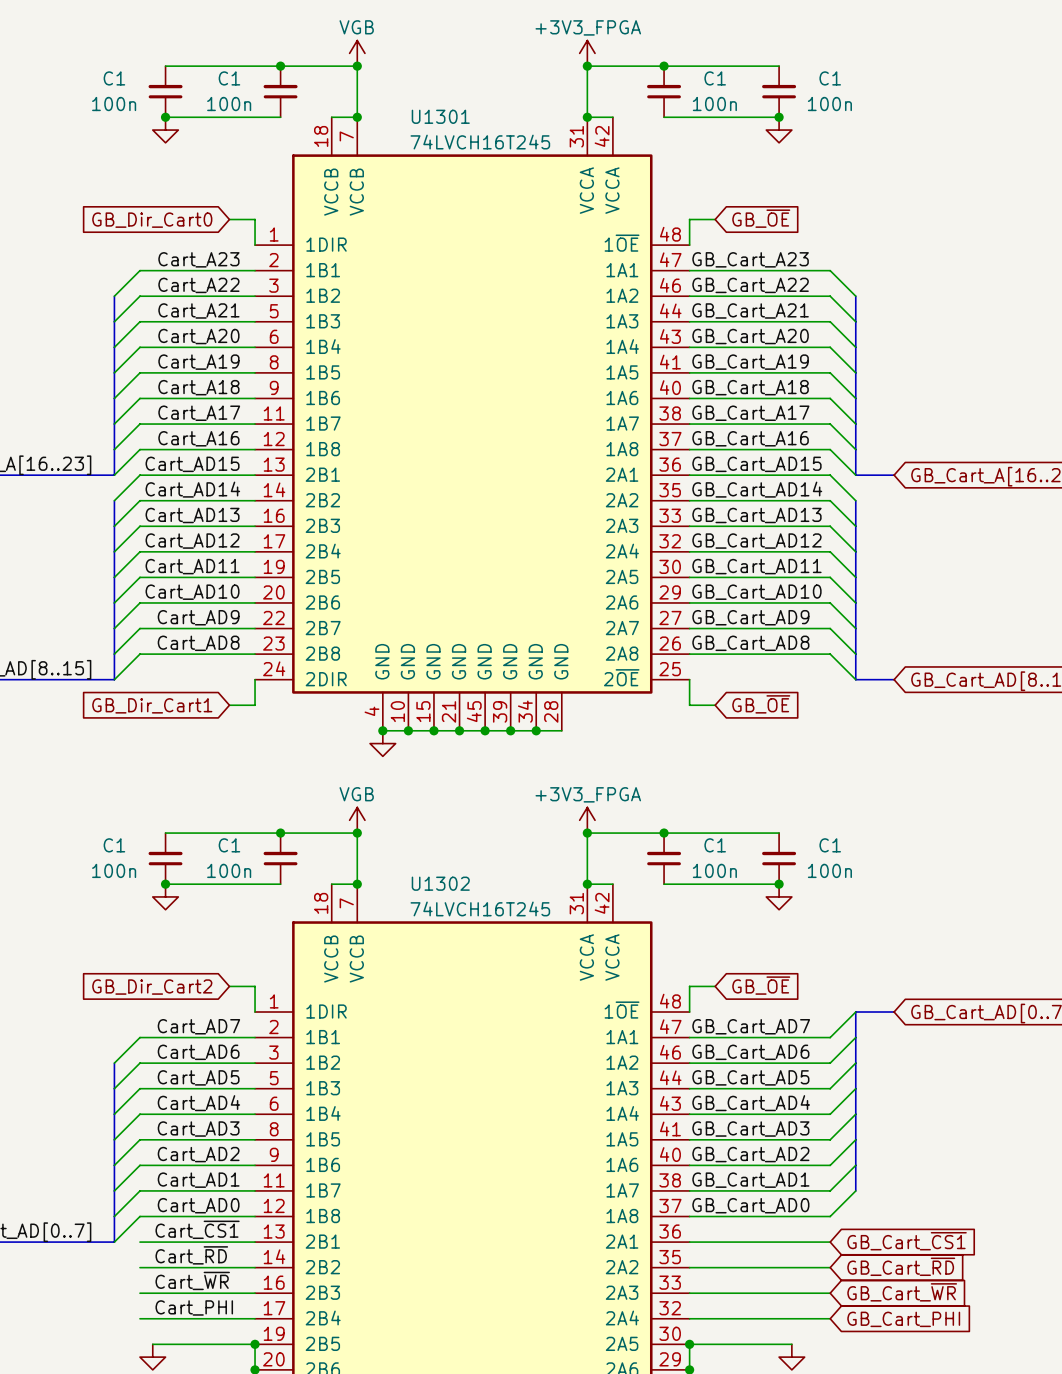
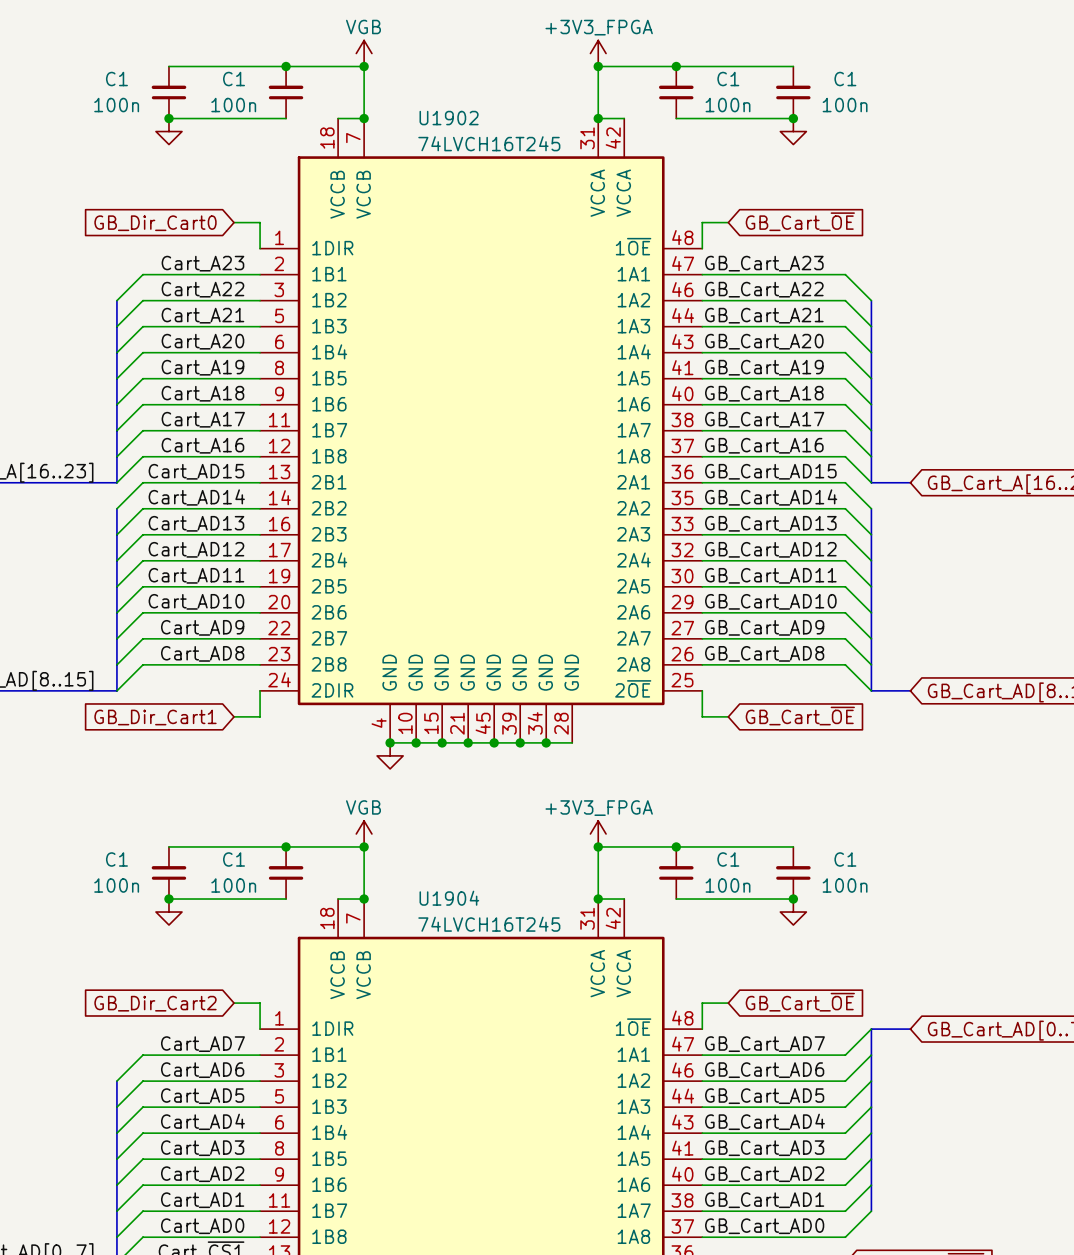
U1301 name: U1301 (440, 116) -> U1902 (449, 118)
global label: GB_~{OE} (761, 218) -> GB_Cart_~{OE} (800, 221)
global label: GB_~{OE} (761, 704) -> GB_Cart_~{OE} (800, 716)
U1302 name: U1302 (440, 883) -> U1904 (449, 898)
global label: GB_~{OE} (761, 985) -> GB_Cart_~{OE} (800, 1002)

